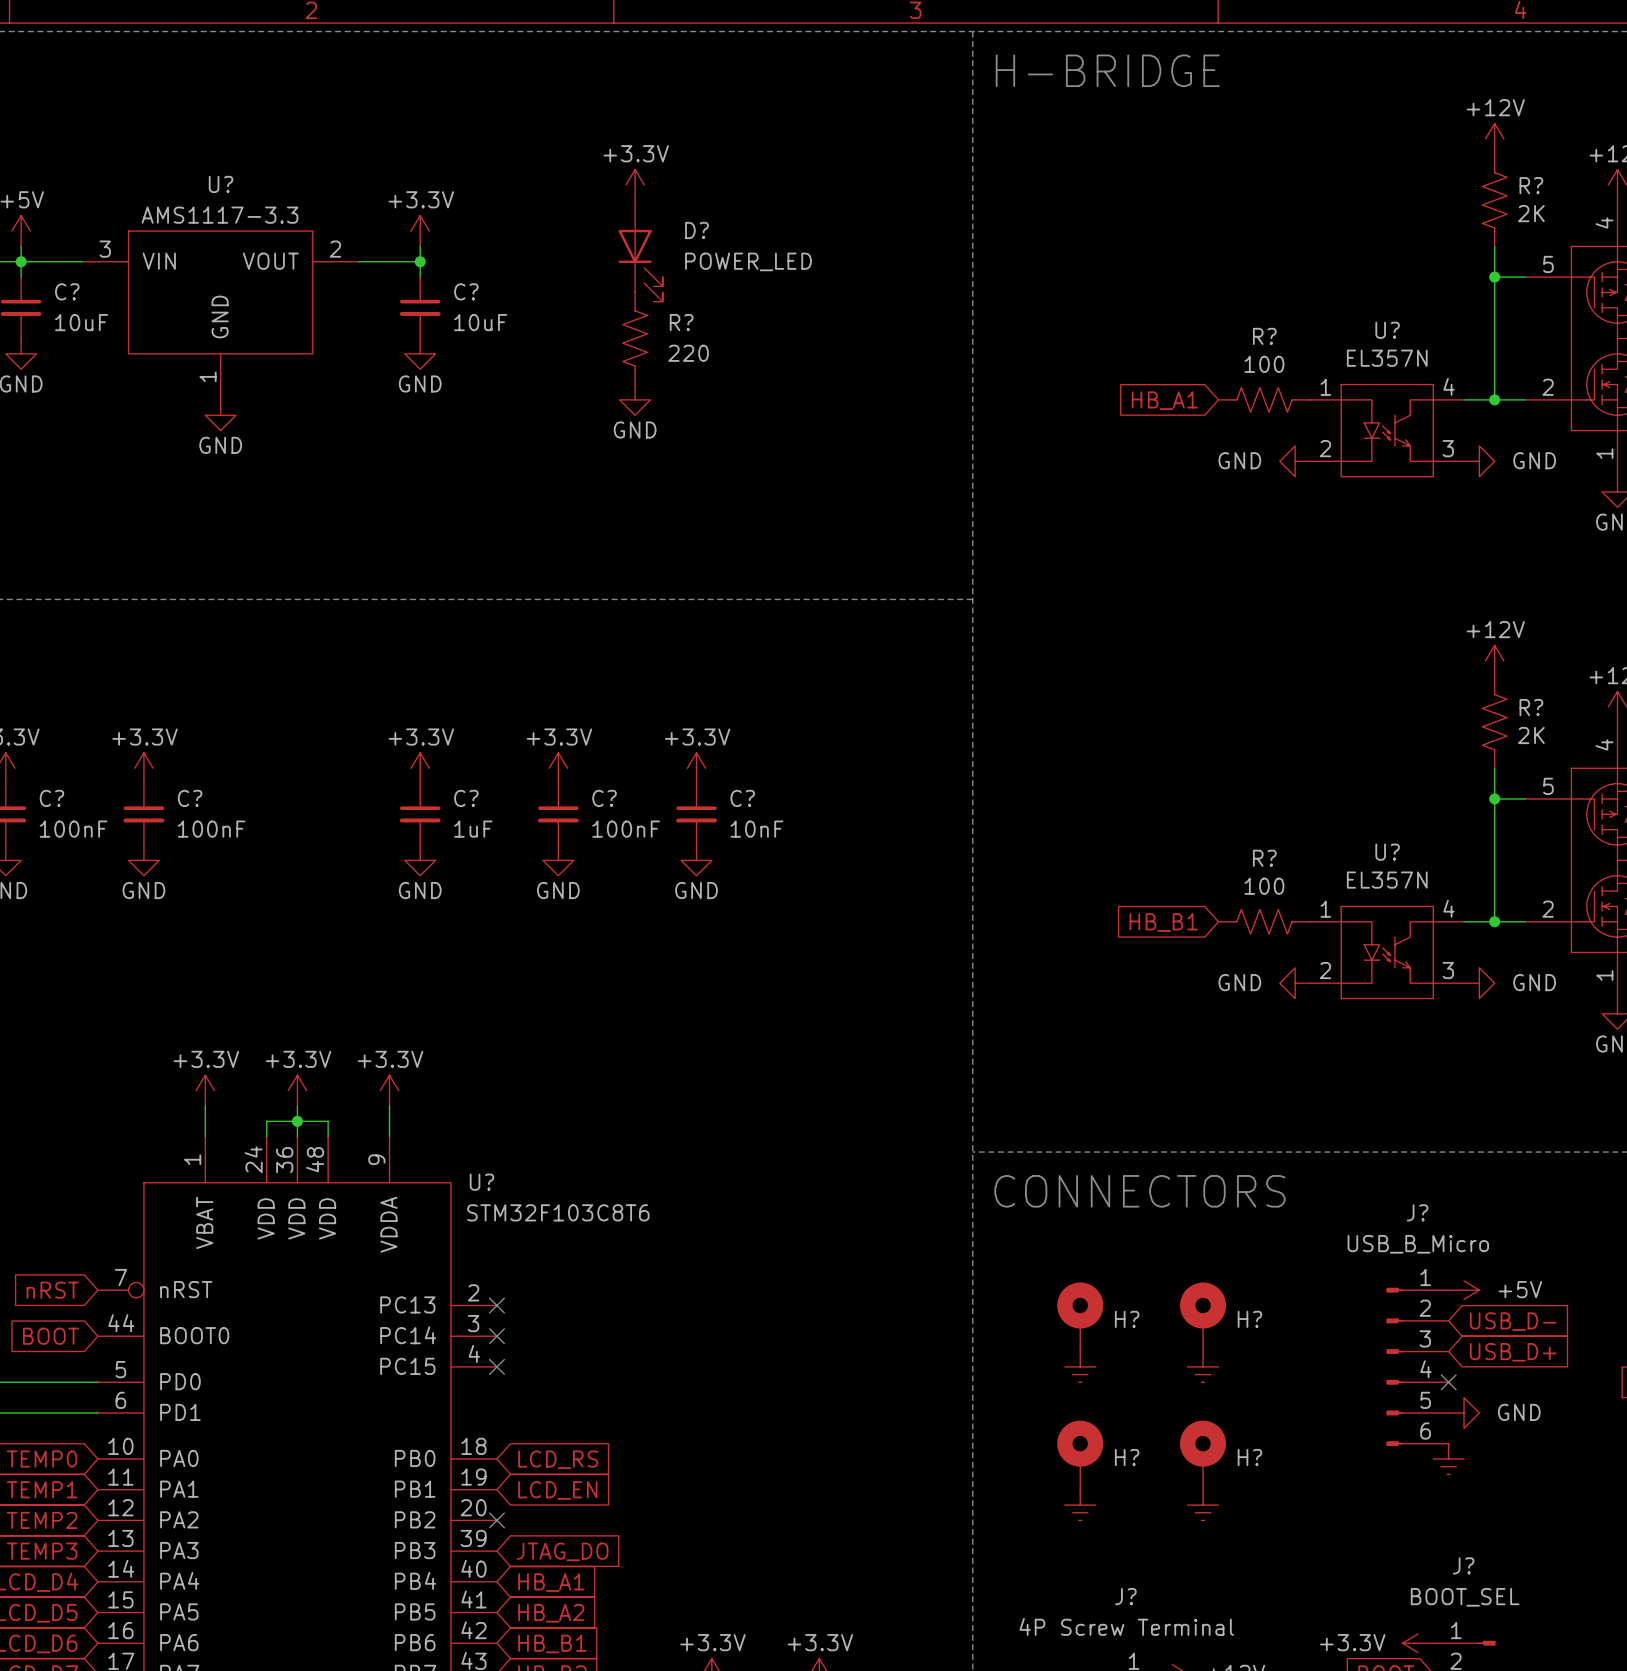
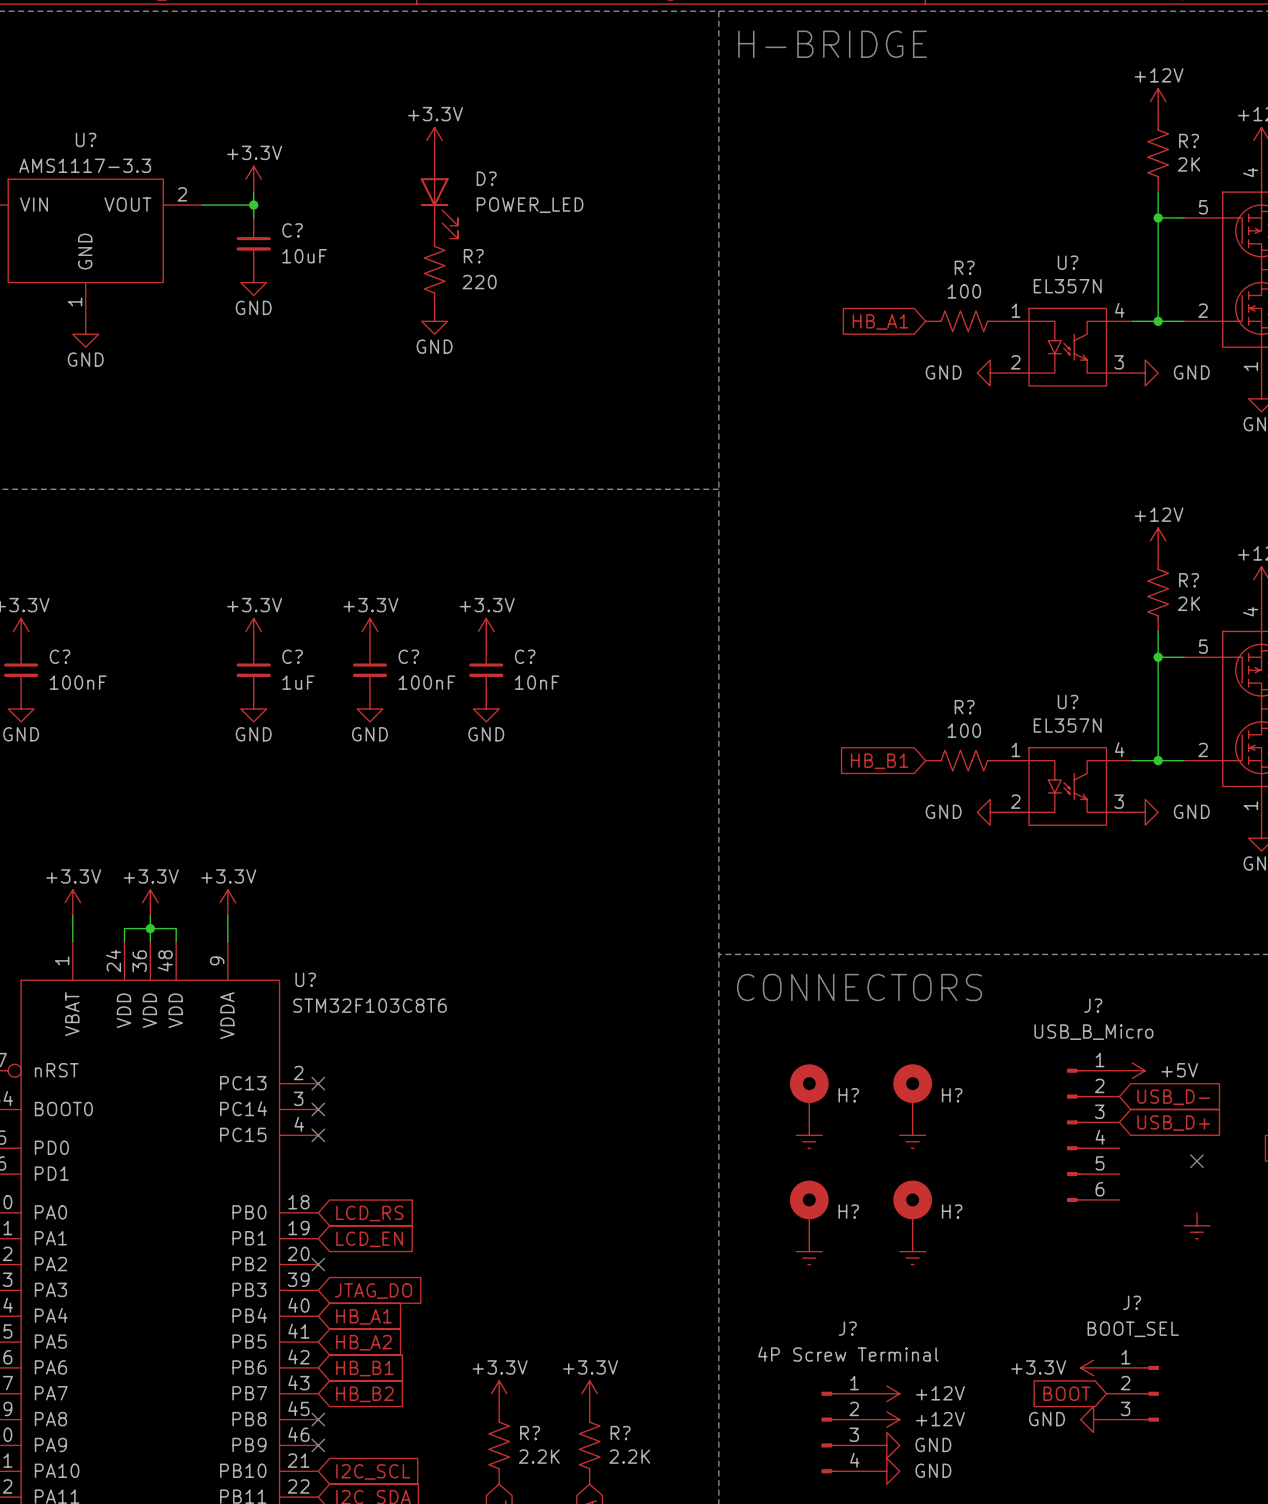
no-connect mark: (1448, 1382) -> none
no-connect mark: none -> (1196, 1161)
power symbol: GND (1463, 1412) -> none
power symbol position: (1448, 1459) -> (1196, 1225)

